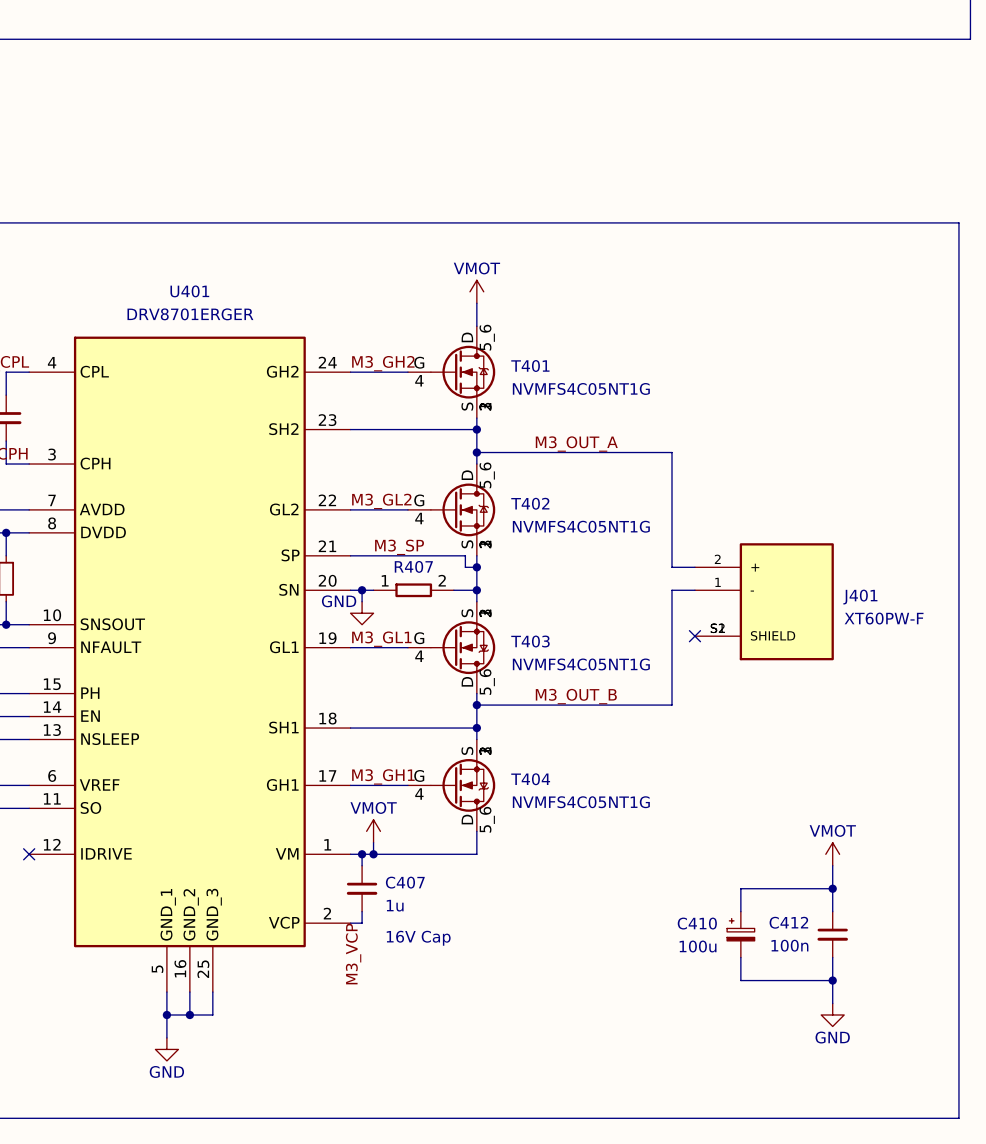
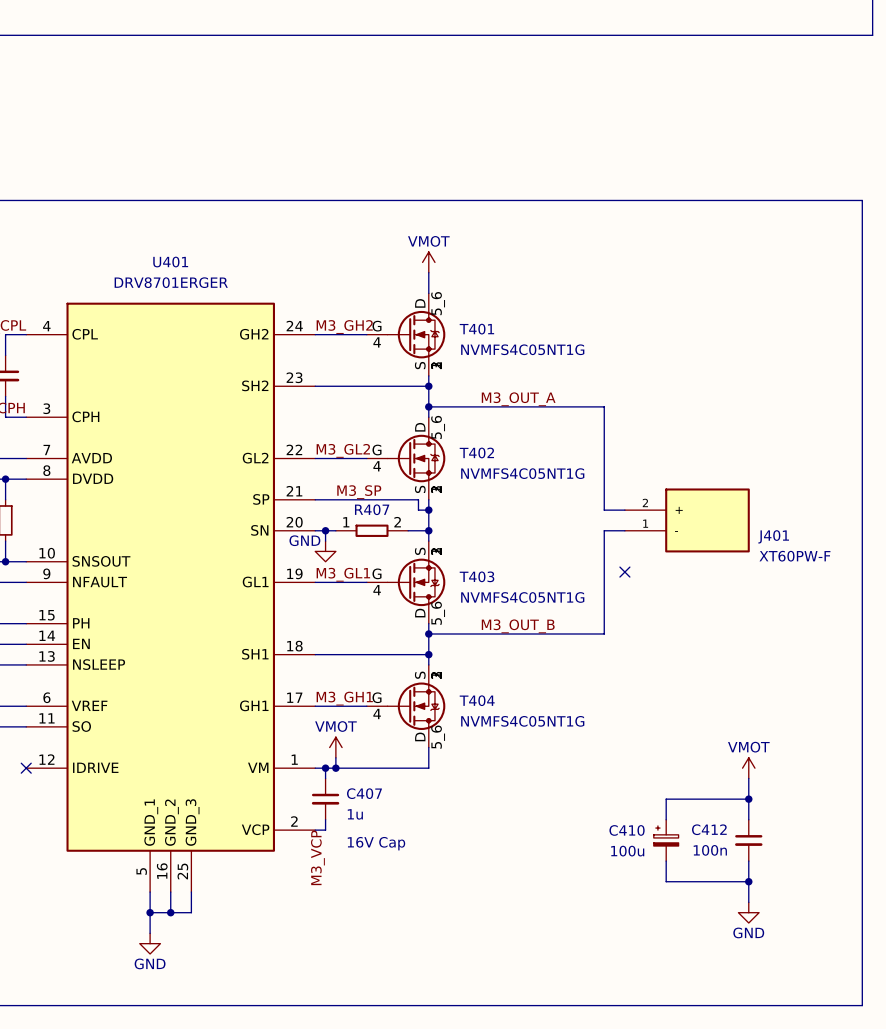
J401 symbol: [694, 543, 834, 661] -> [624, 488, 750, 553]

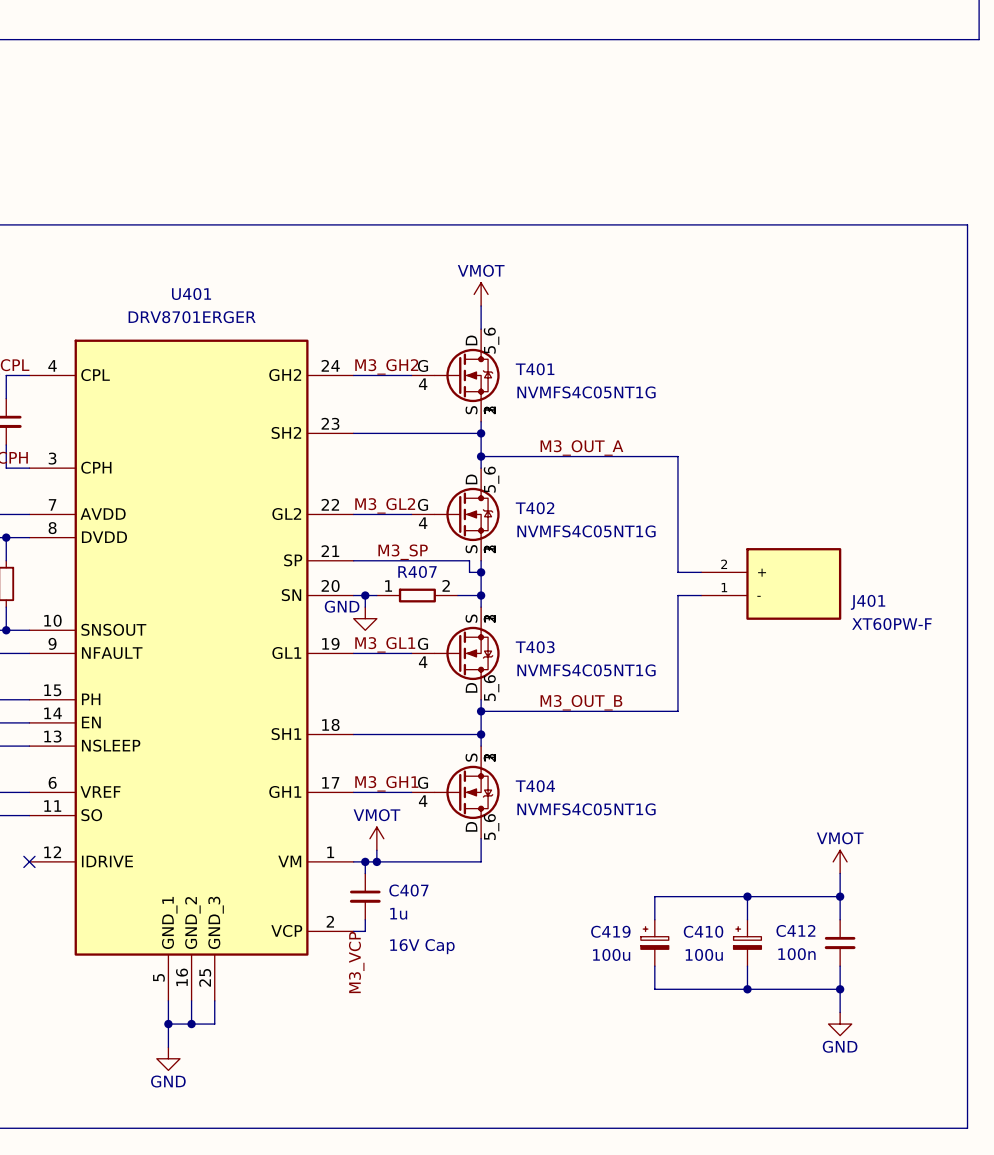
no-connect mark: (624, 572) -> none
wire: none -> (747, 896) (654, 896) (654, 919)
junction: none -> (747, 896)
C419: none -> 100u (654, 942)
wire: none -> (654, 966) (654, 989) (747, 989)
junction: none -> (747, 989)

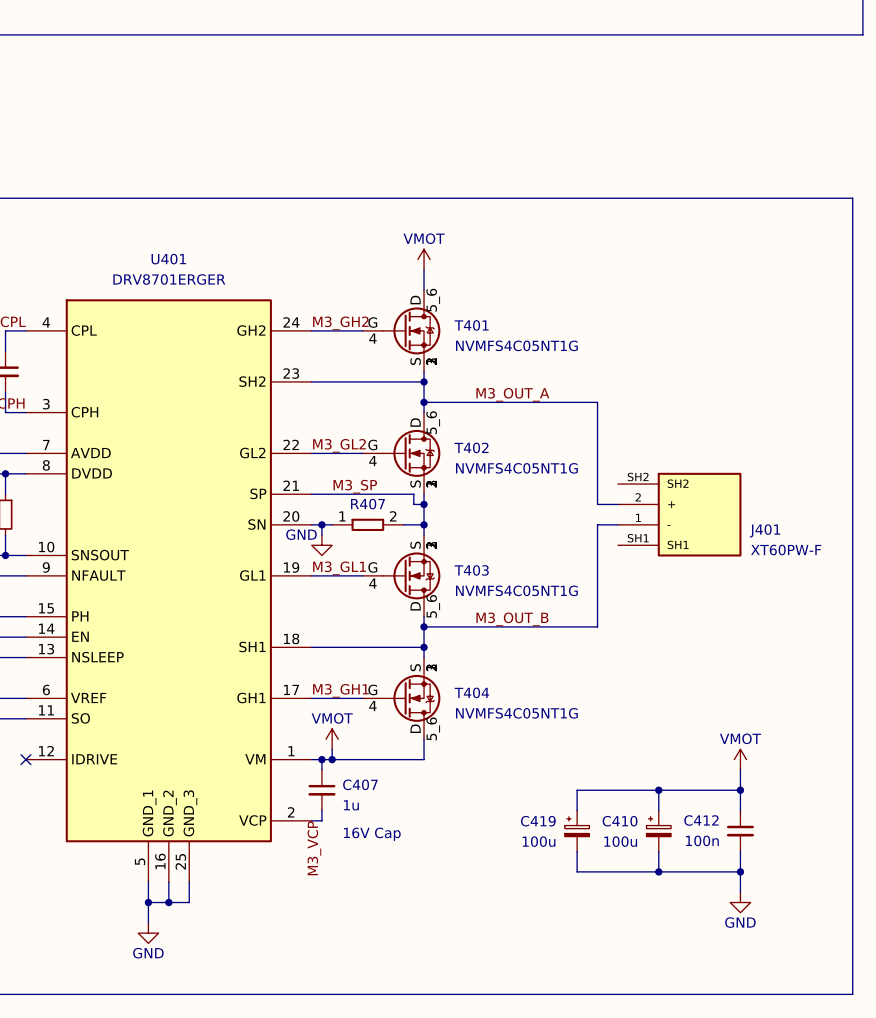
J401 symbol: [701, 548, 842, 620] -> [617, 472, 742, 557]

